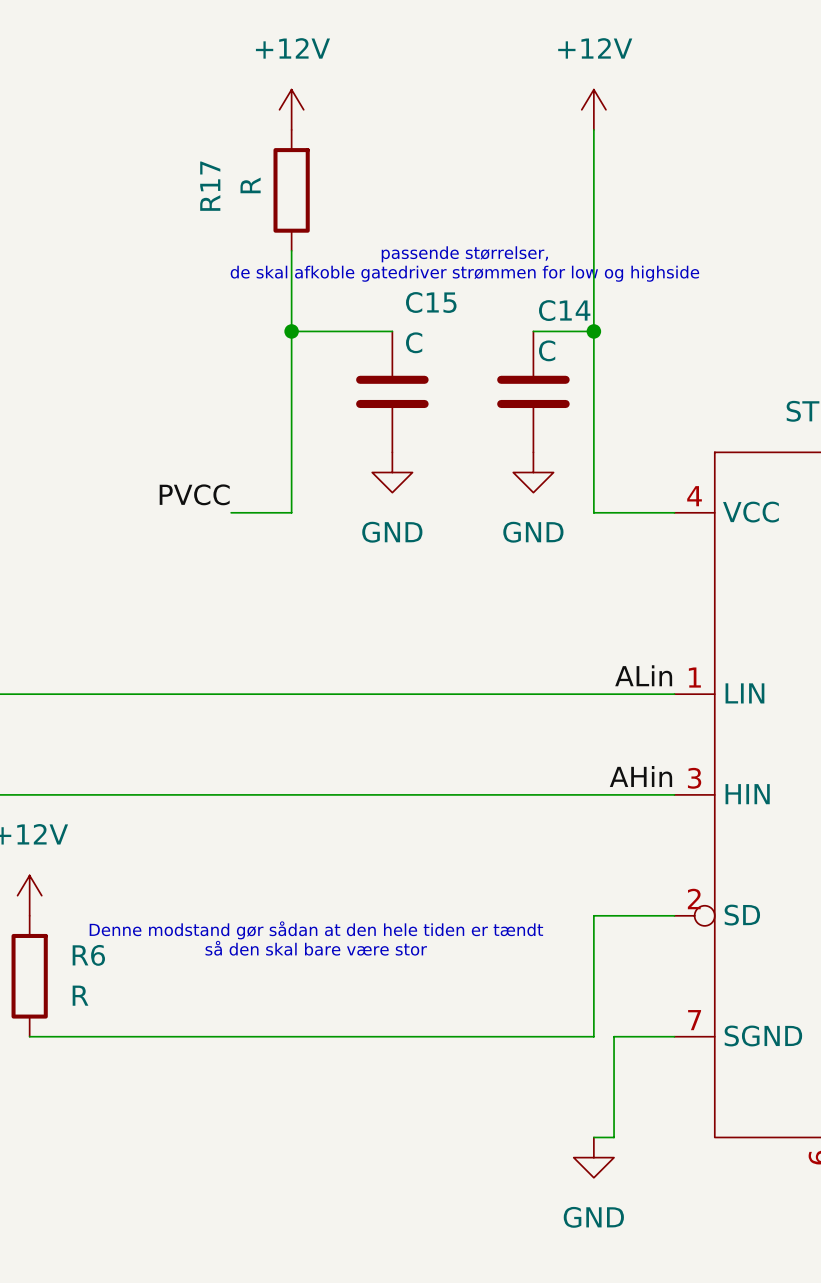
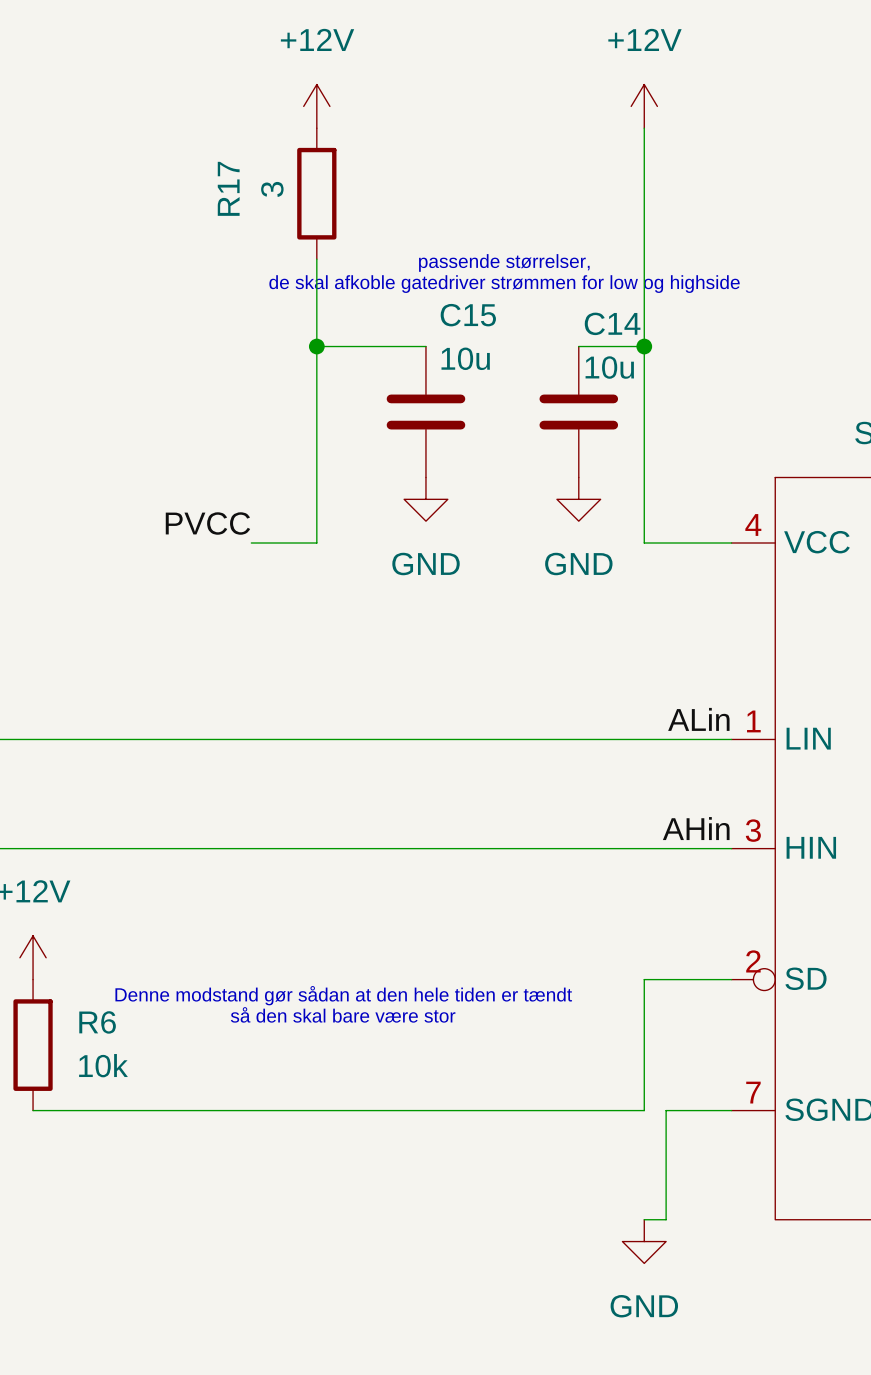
R17 value: R (250, 185) -> 3 (272, 189)
C15 value: C (414, 342) -> 10u (465, 358)
C14 value: C (547, 350) -> 10u (609, 367)
R6 value: R (80, 995) -> 10k (103, 1065)

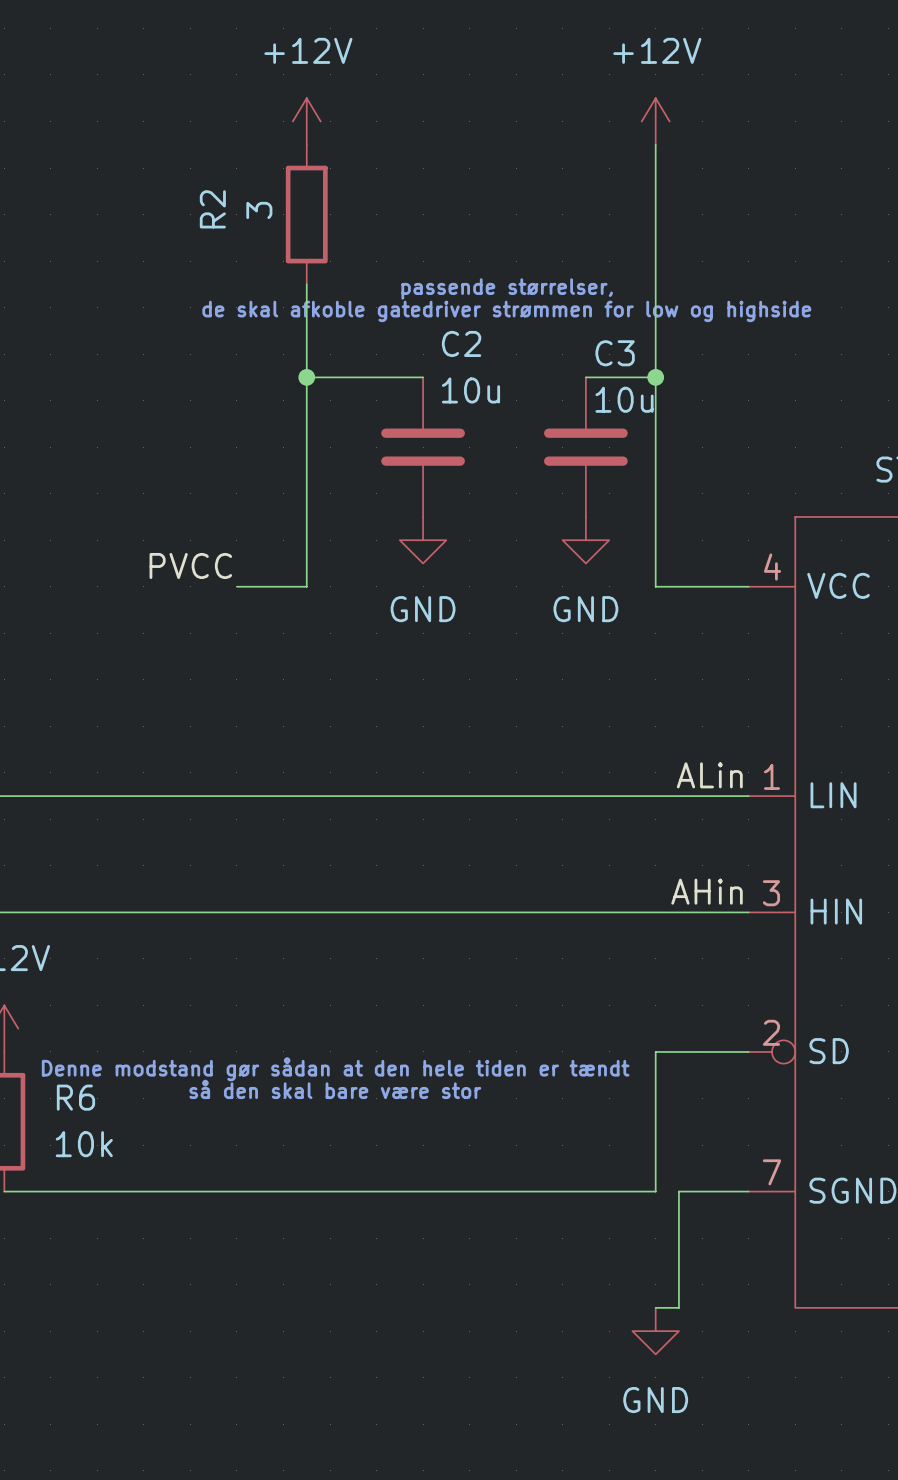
R17 name: R17 (228, 188) -> R2 (212, 209)
C15 name: C15 (468, 315) -> C2 (461, 343)
C14 name: C14 (612, 323) -> C3 (615, 353)

